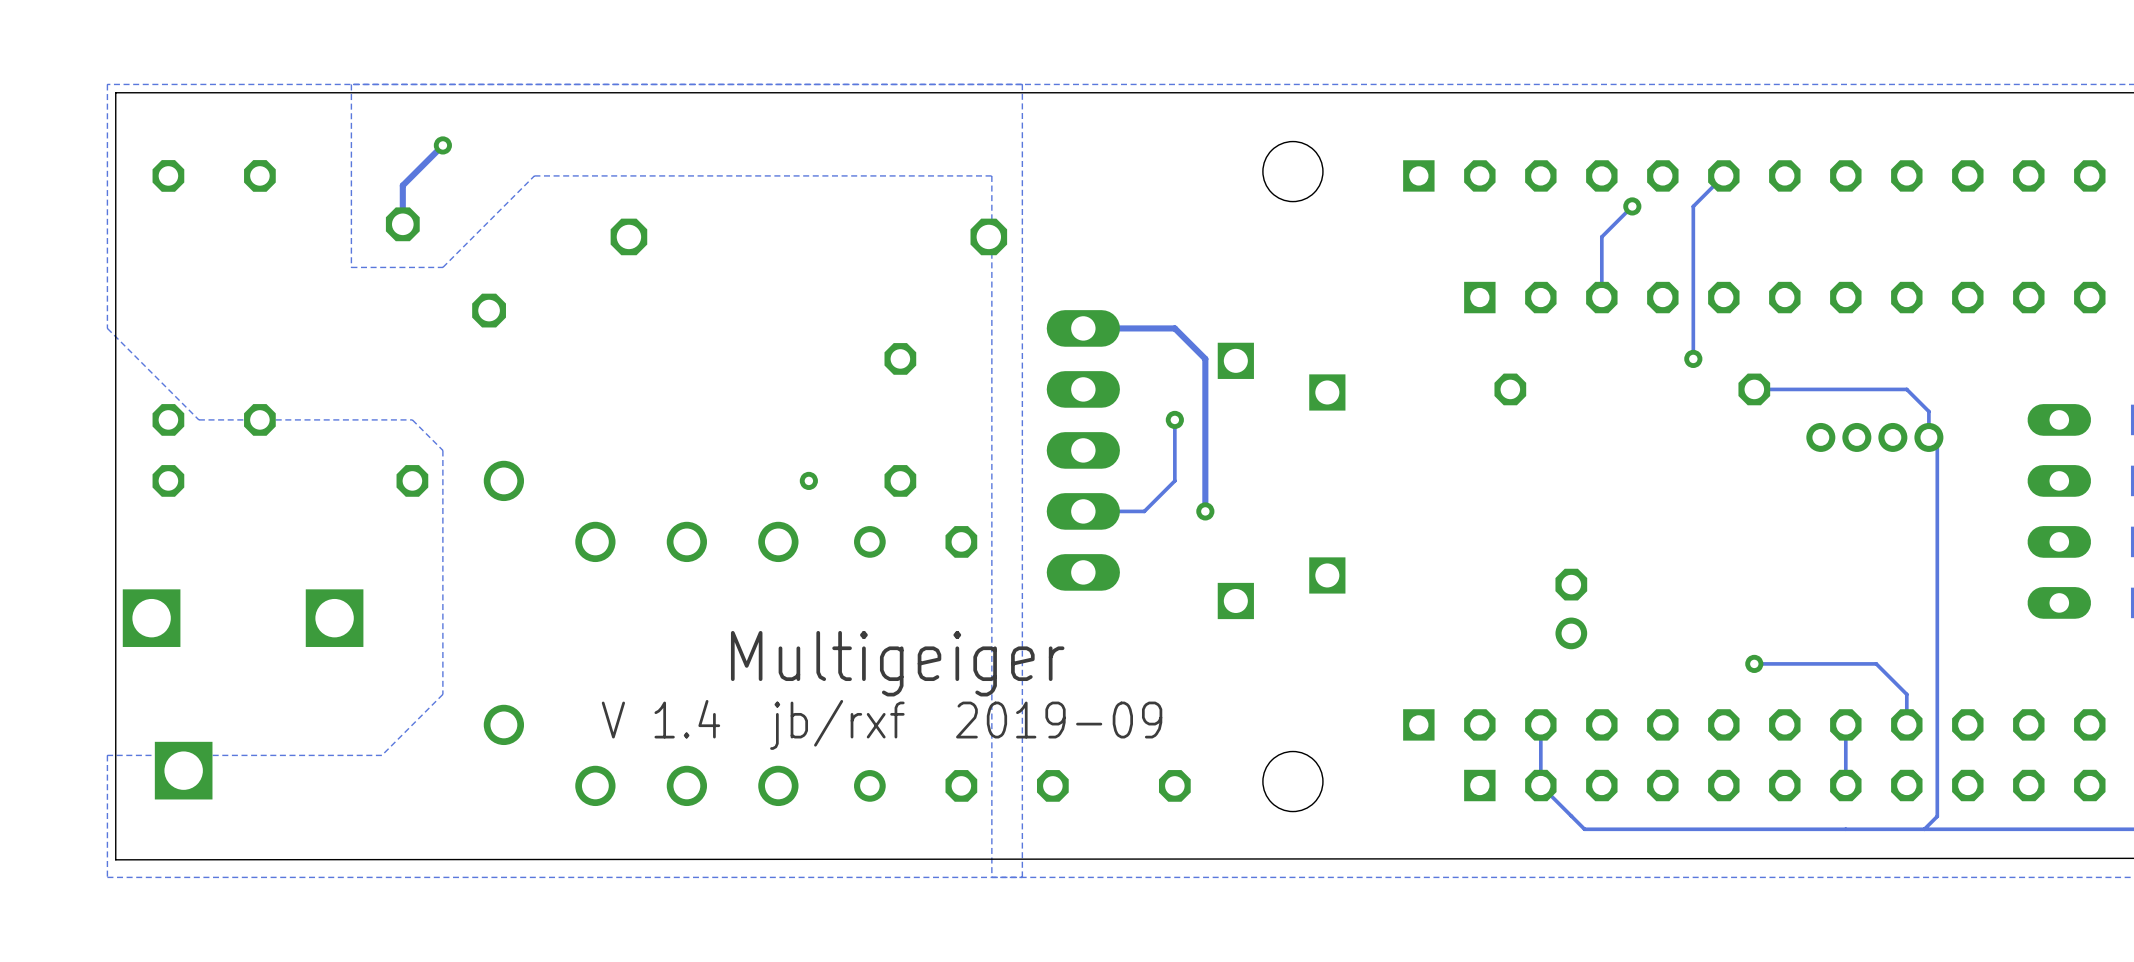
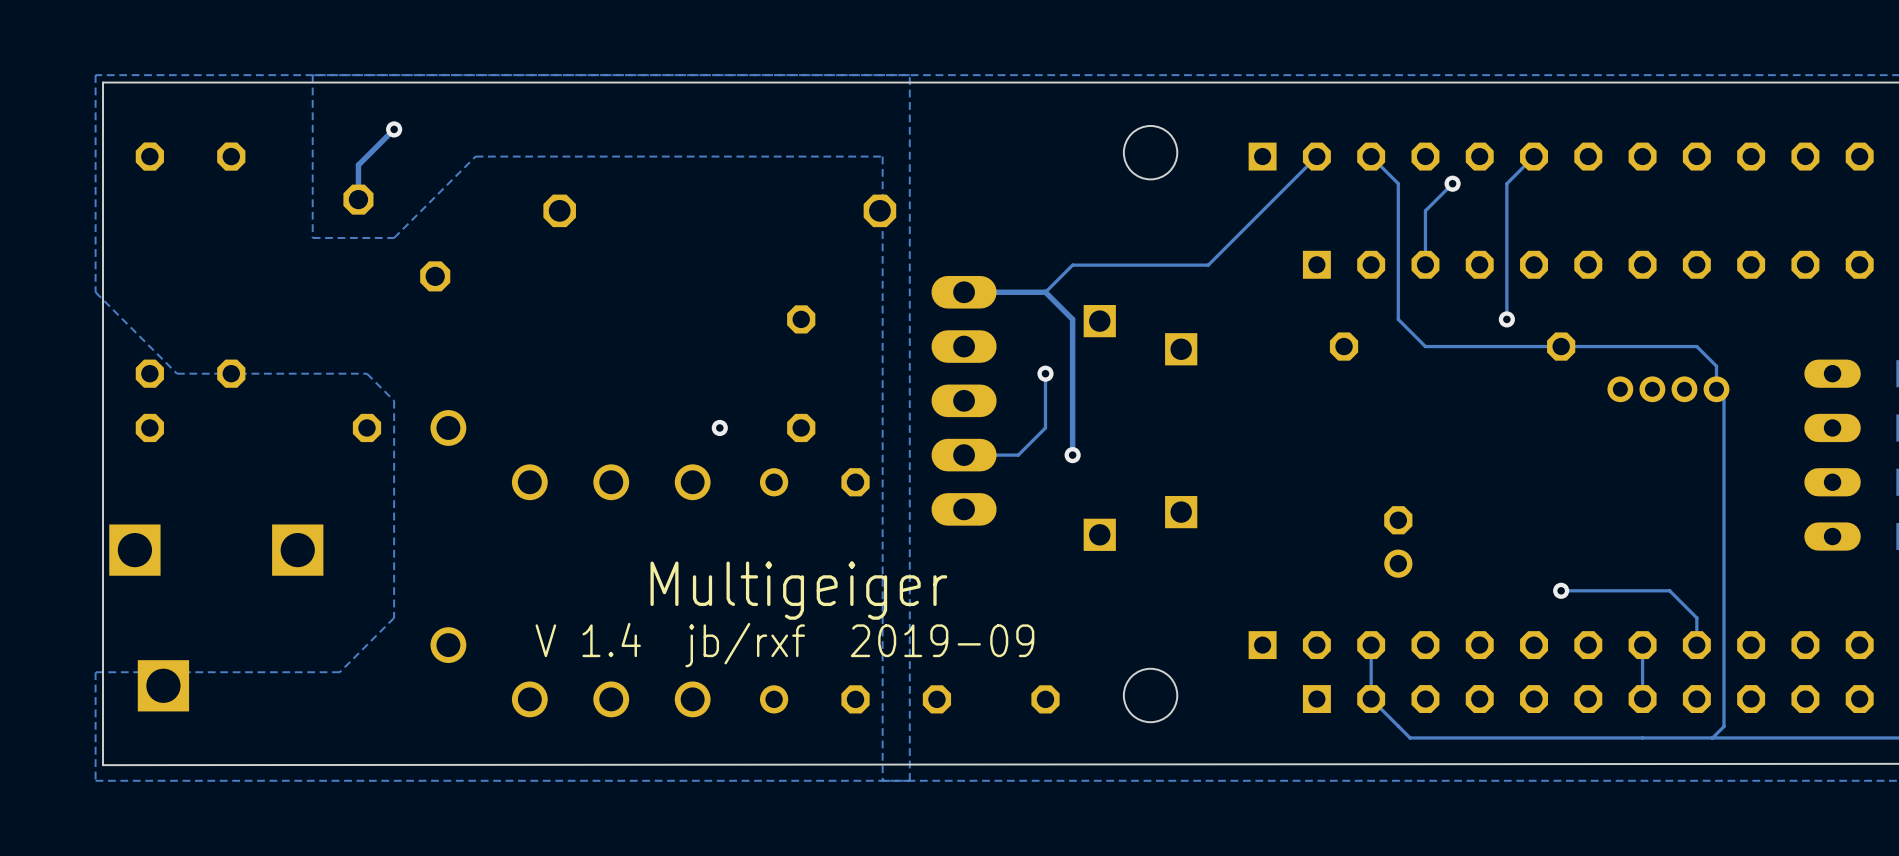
track: none -> (1316, 156) (1208, 265) (1072, 265) (1045, 292)
track: none -> (1371, 156) (1398, 183) (1398, 319) (1425, 346) (1561, 346)

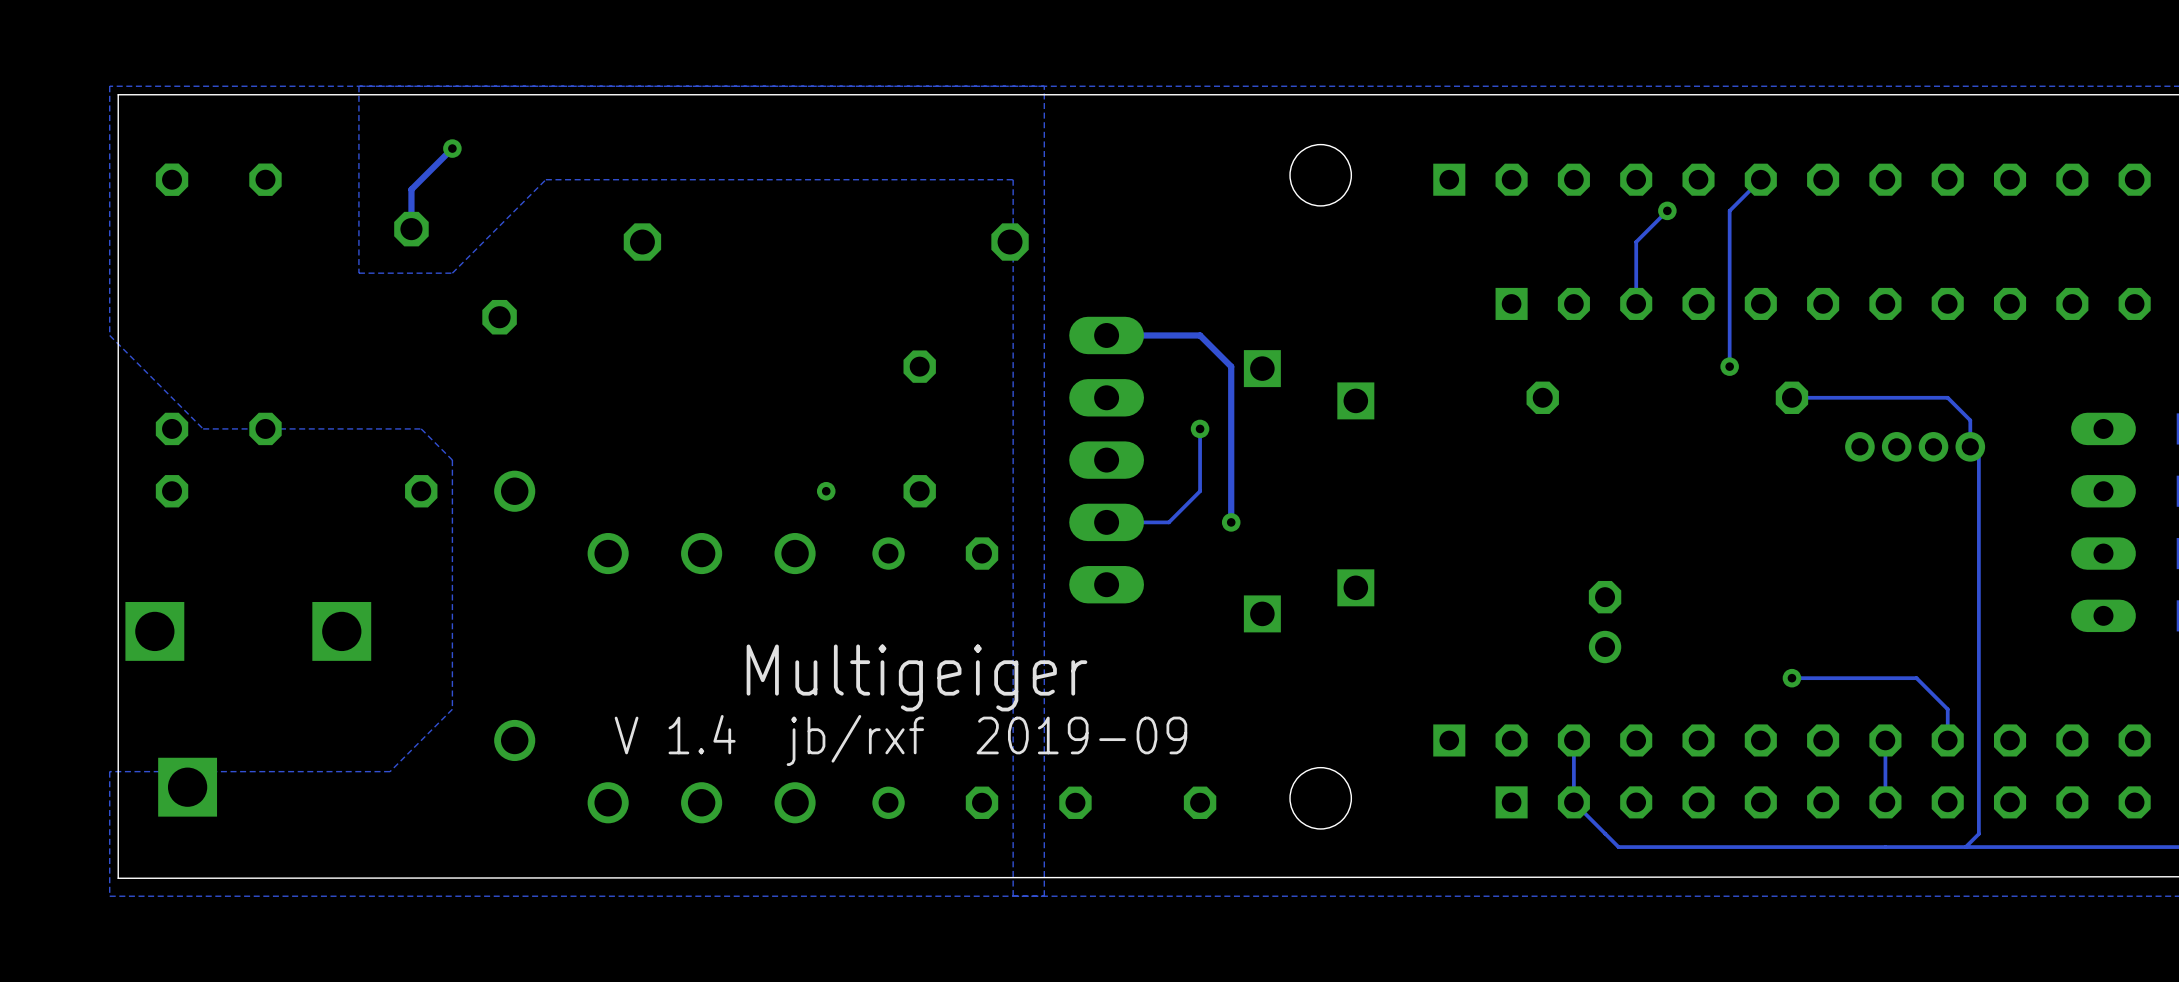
track: (1316, 156) (1208, 265) (1072, 265) (1045, 292) -> none
track: (1371, 156) (1398, 183) (1398, 319) (1425, 346) (1561, 346) -> none

